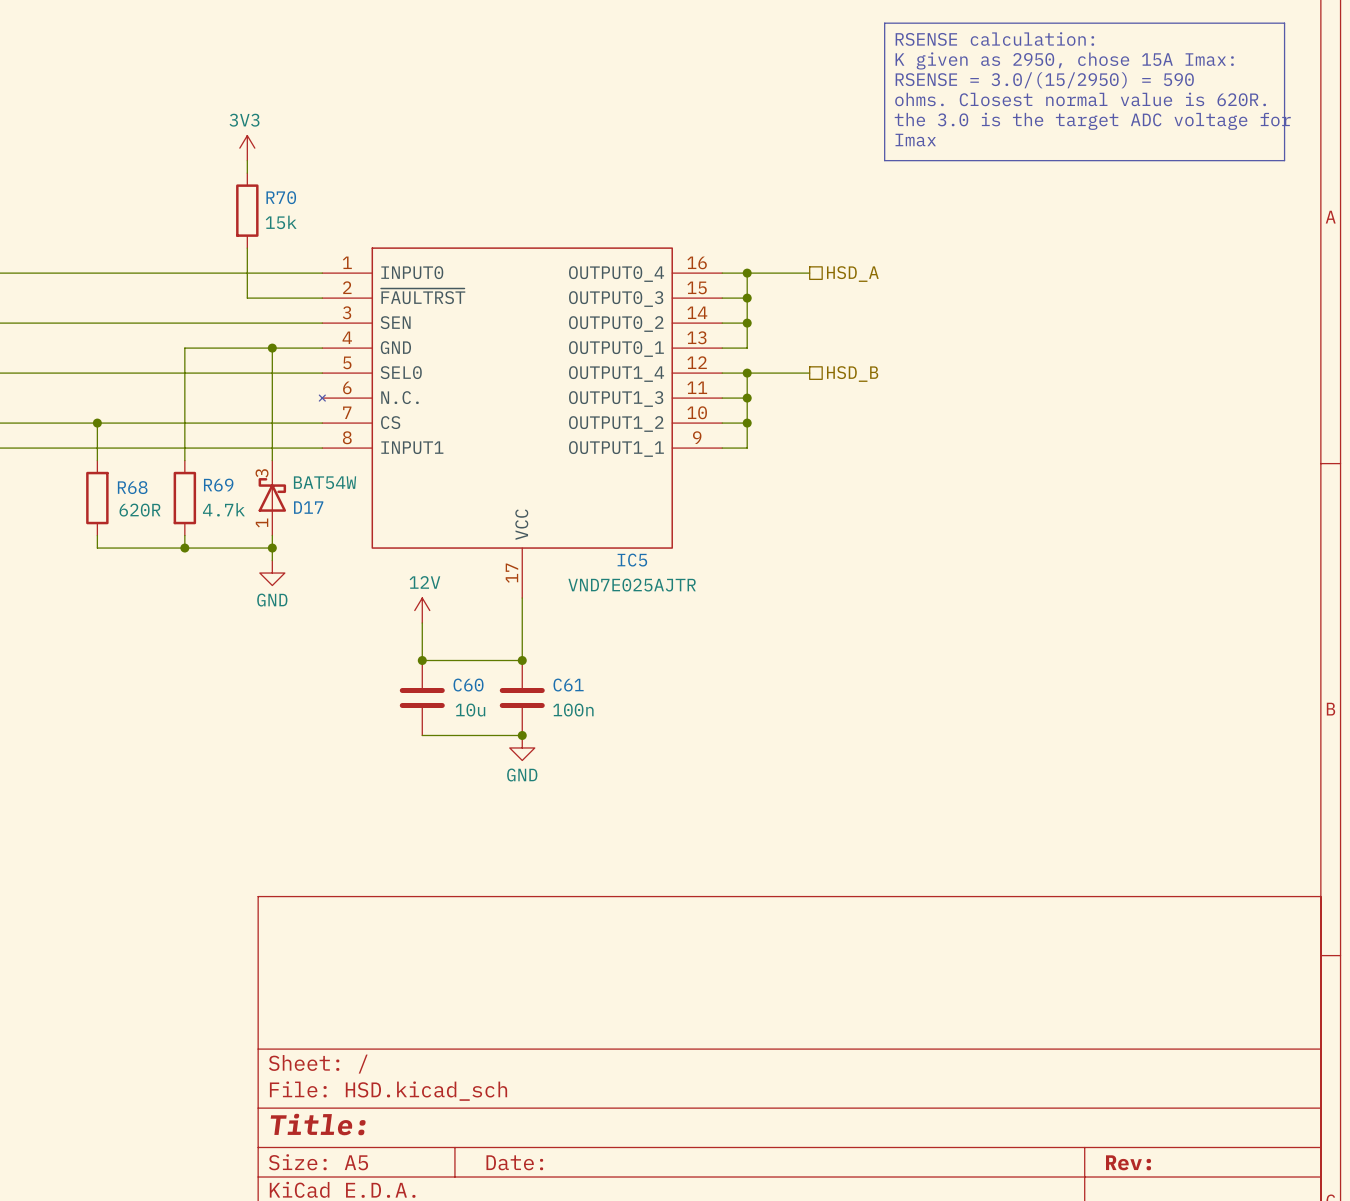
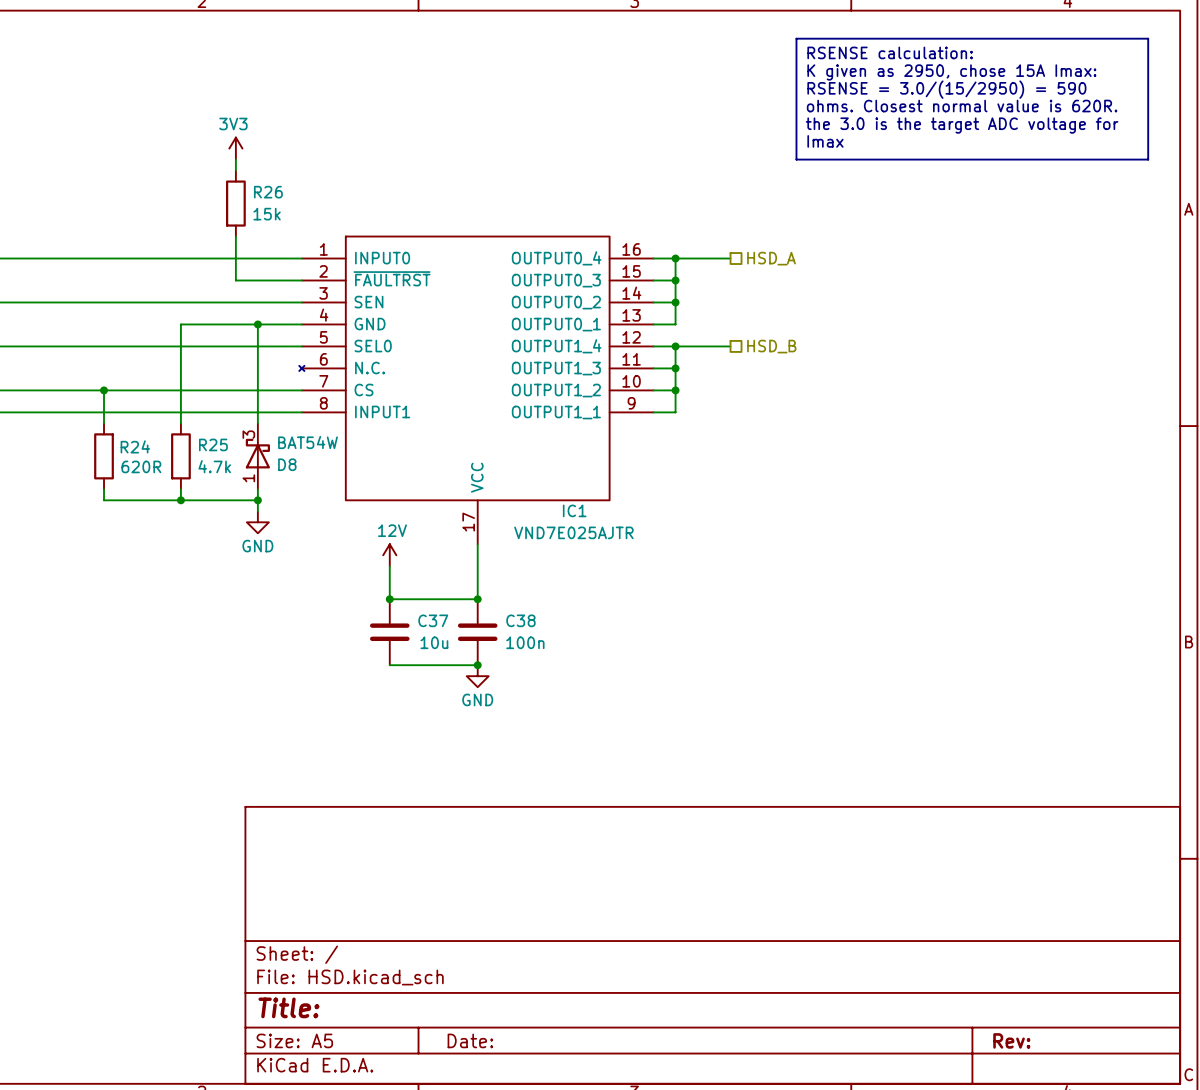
R70 name: R70 (281, 197) -> R26 (268, 192)
R69 name: R69 (218, 485) -> R25 (213, 444)
R68 name: R68 (132, 487) -> R24 (135, 446)
D17 name: D17 (308, 507) -> D8 (287, 464)
IC5 name: IC5 (632, 560) -> IC1 (574, 510)
C60 name: C60 (468, 685) -> C37 (433, 620)
C61 name: C61 (568, 685) -> C38 (520, 620)

